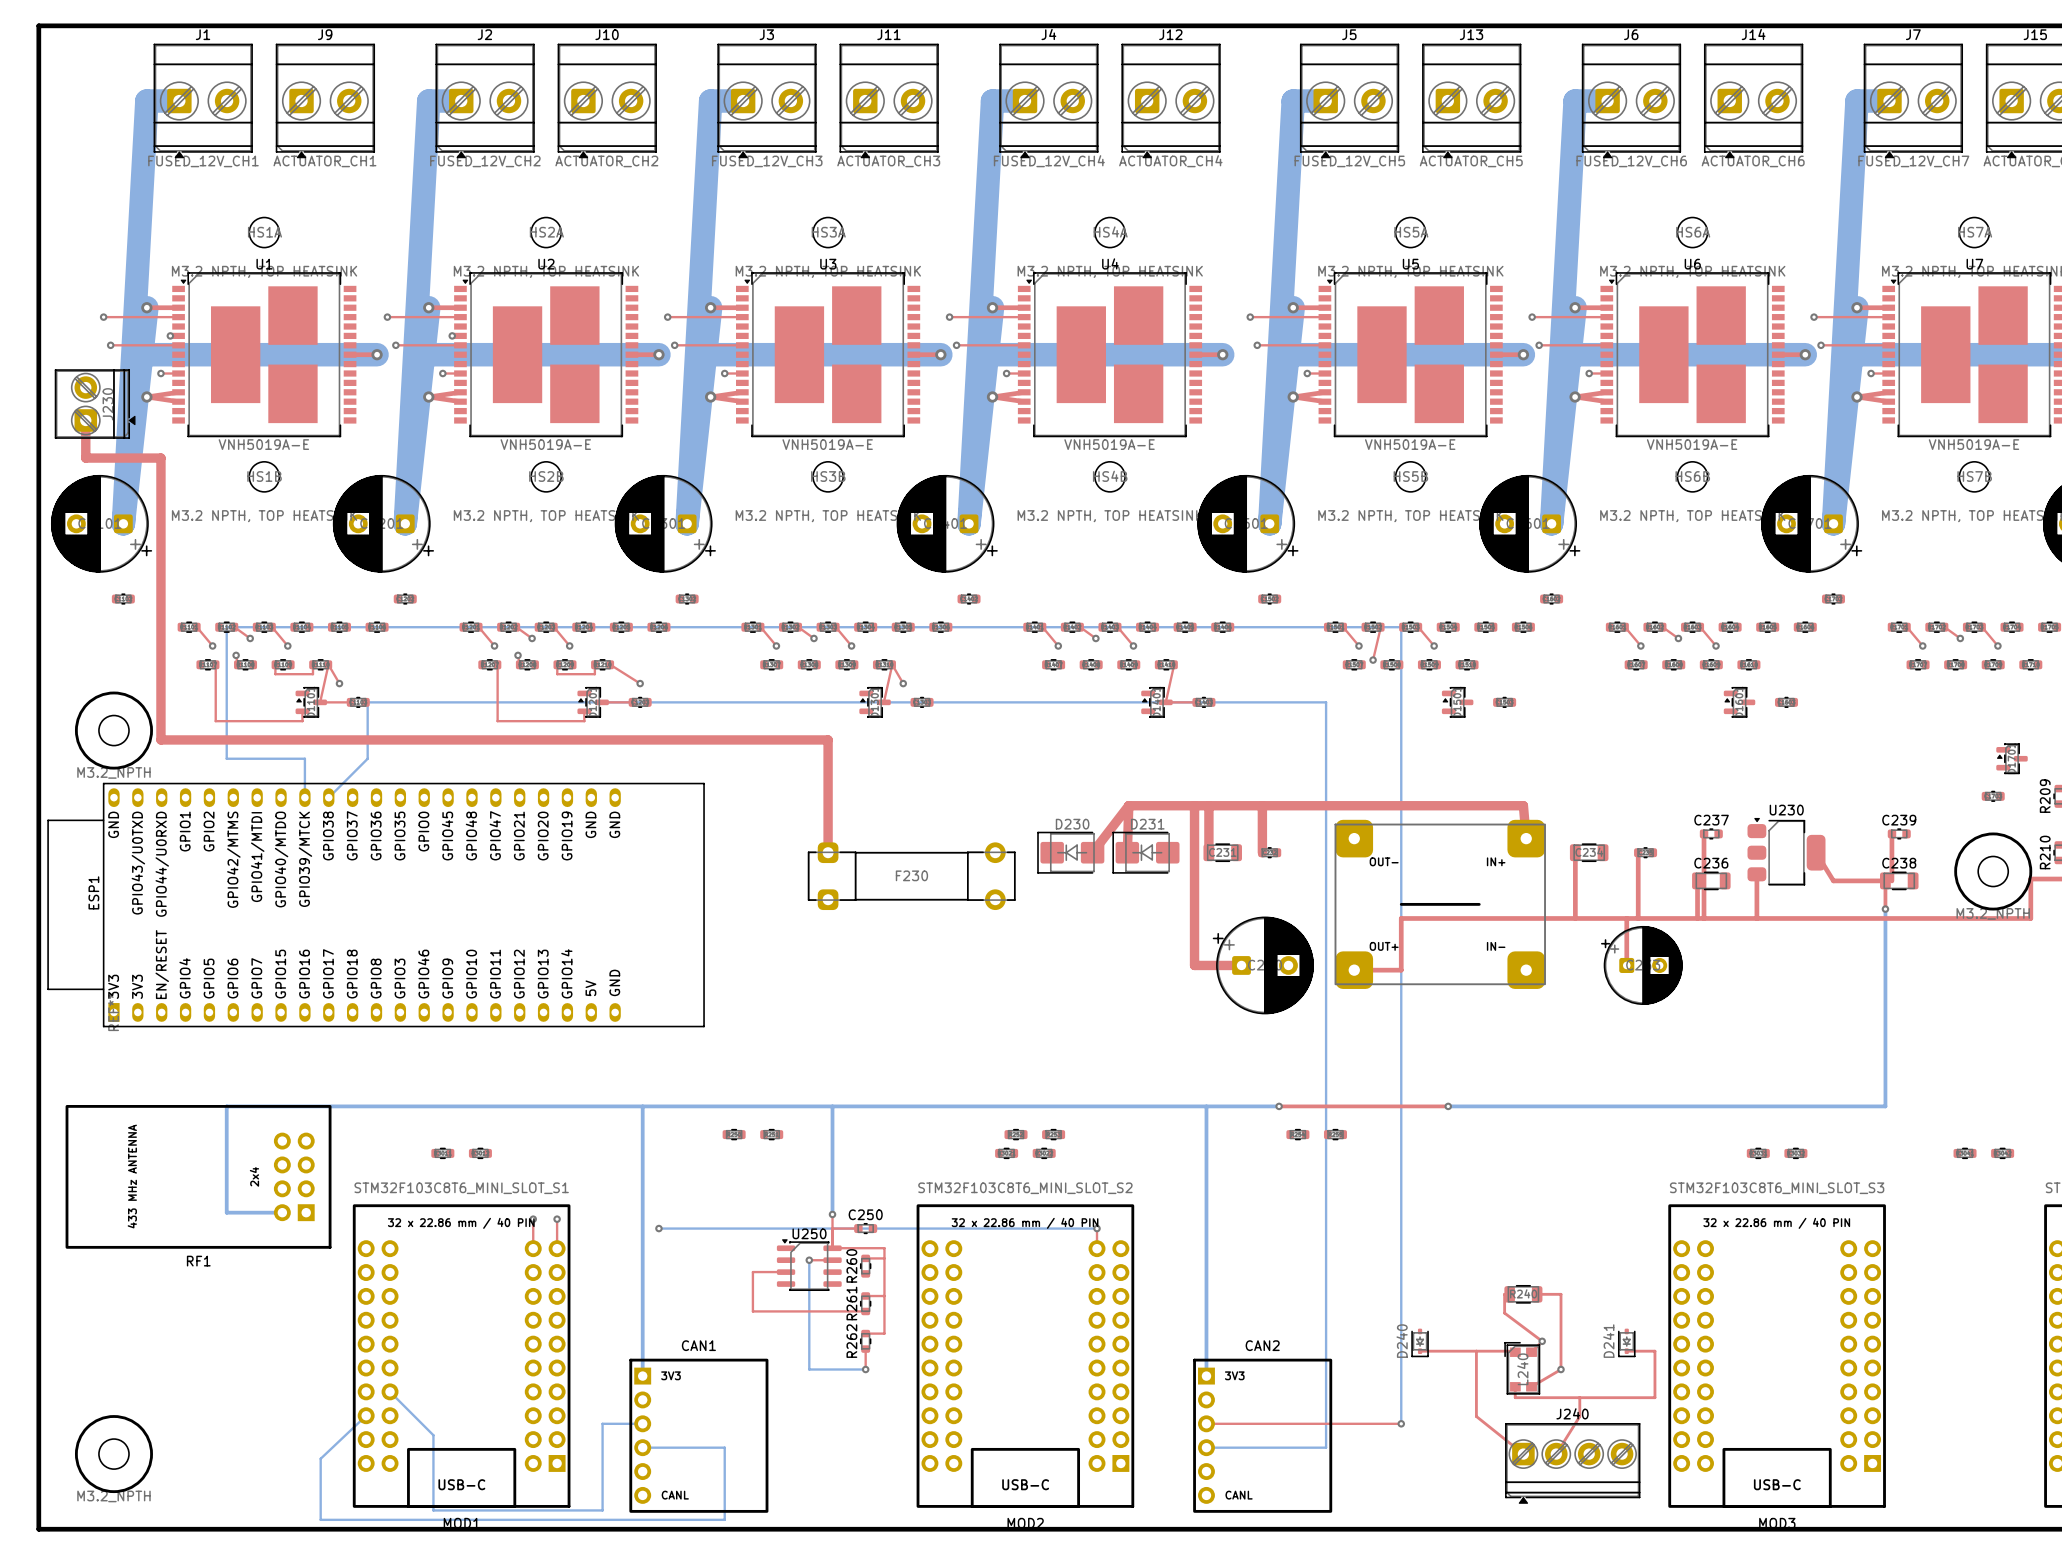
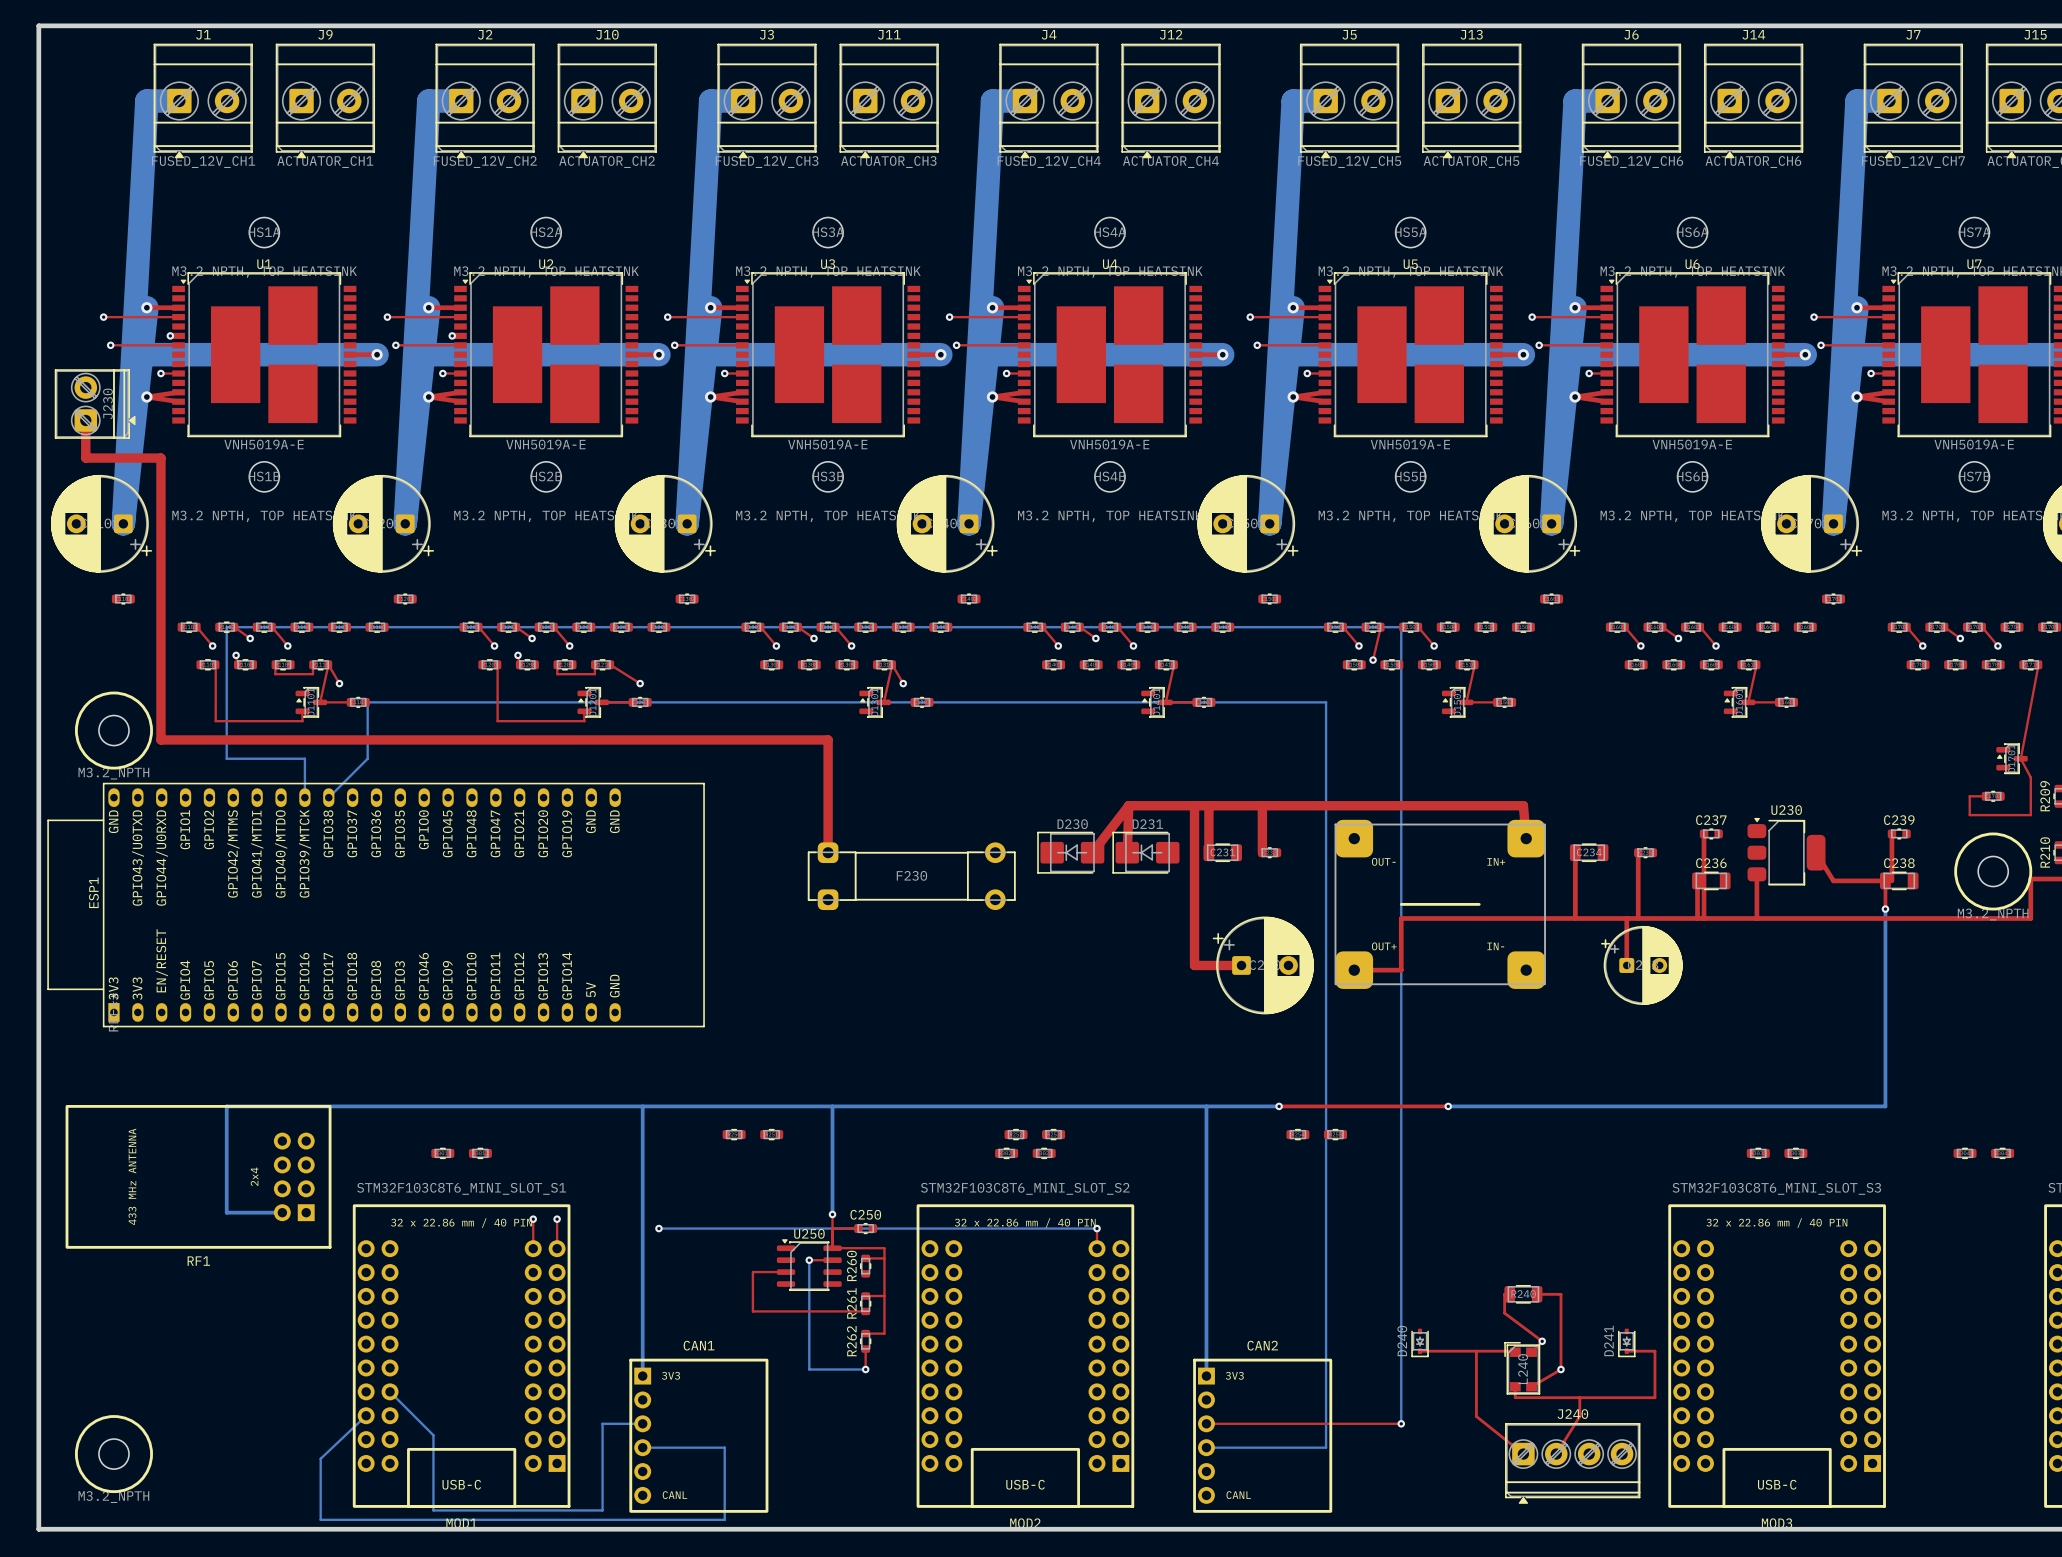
top track: none -> (1474, 664) (1466, 702) (1497, 702)
top track: none -> (1756, 664) (1748, 702) (1779, 702)
top track: none -> (2038, 664) (2020, 758) (2030, 777) (2030, 815) (1969, 815) (1969, 796) (1985, 796)

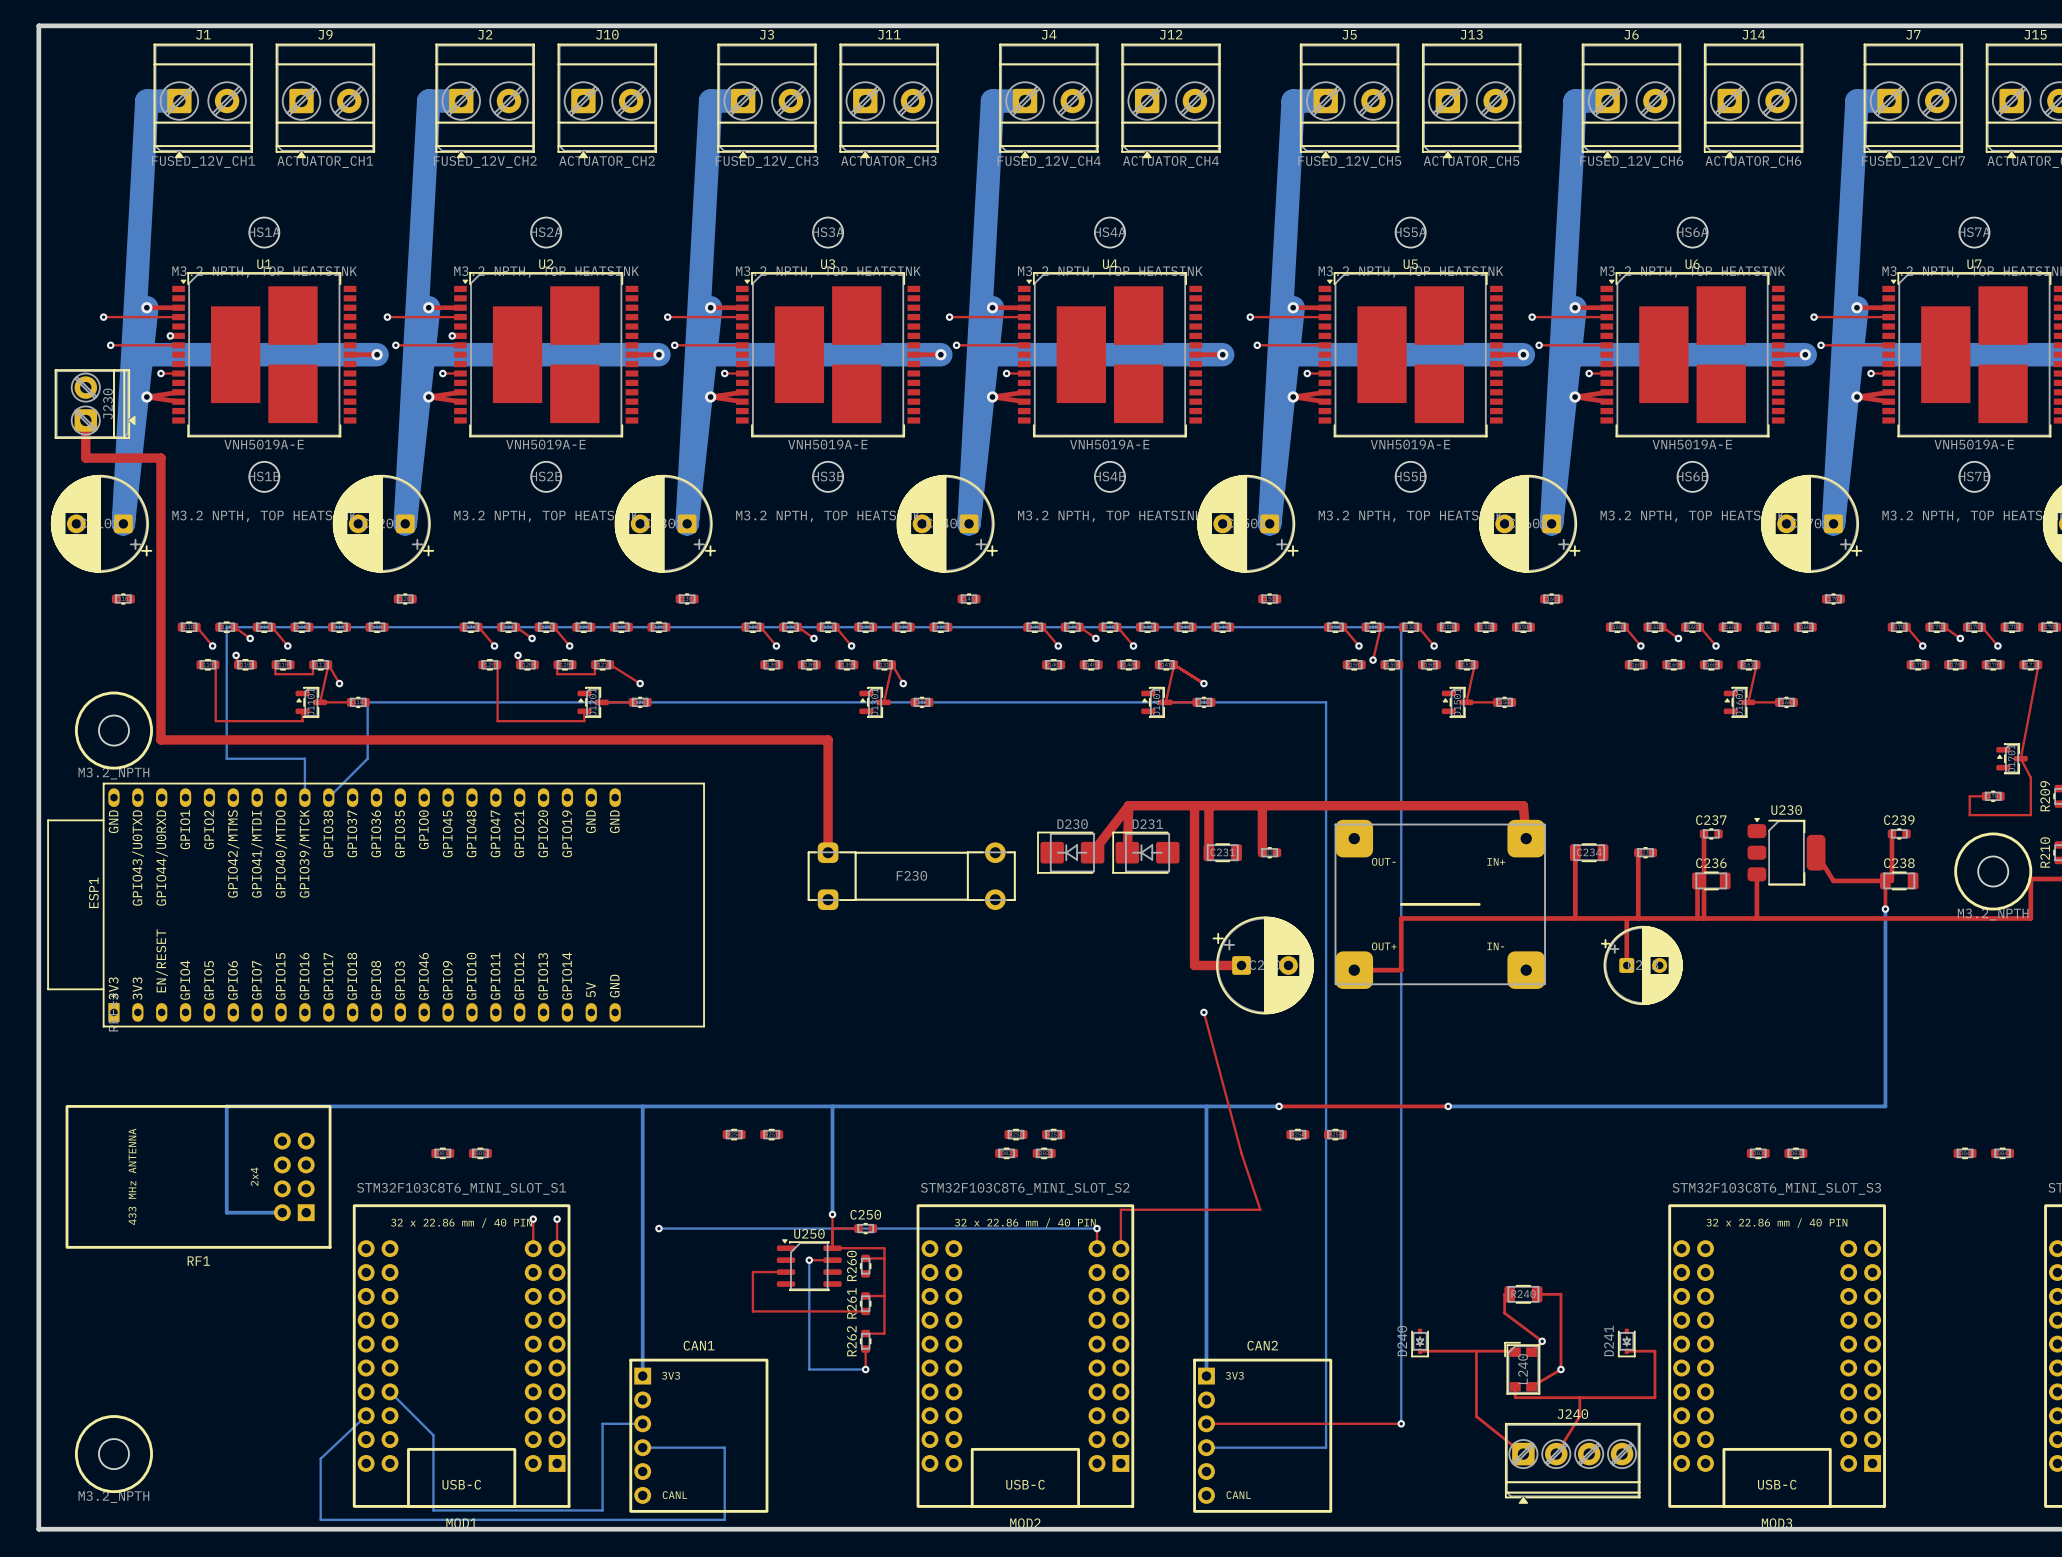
top track: none -> (1174, 664) (1203, 683)
via: none -> (1203, 683)
top track: none -> (1203, 1012) (1241, 1153) (1260, 1209) (1120, 1209) (1120, 1248)
via: none -> (1203, 1012)

